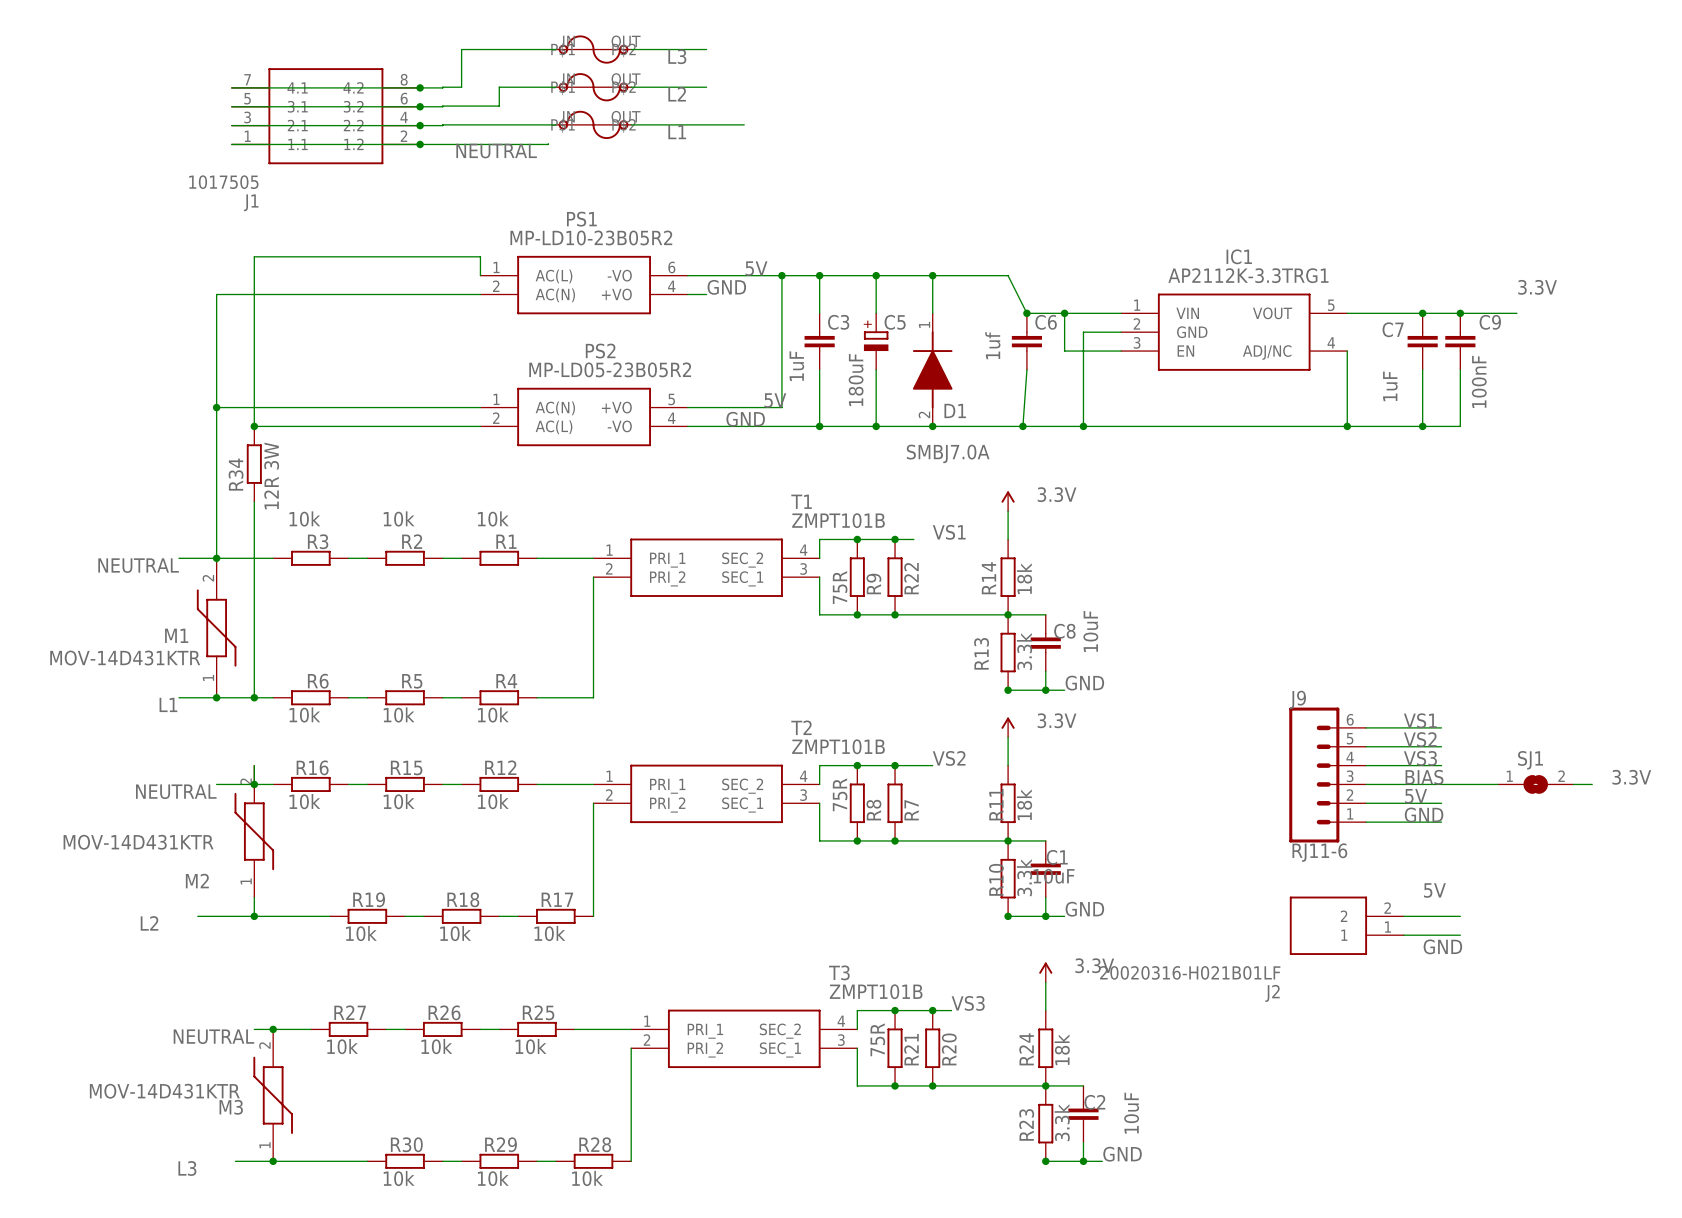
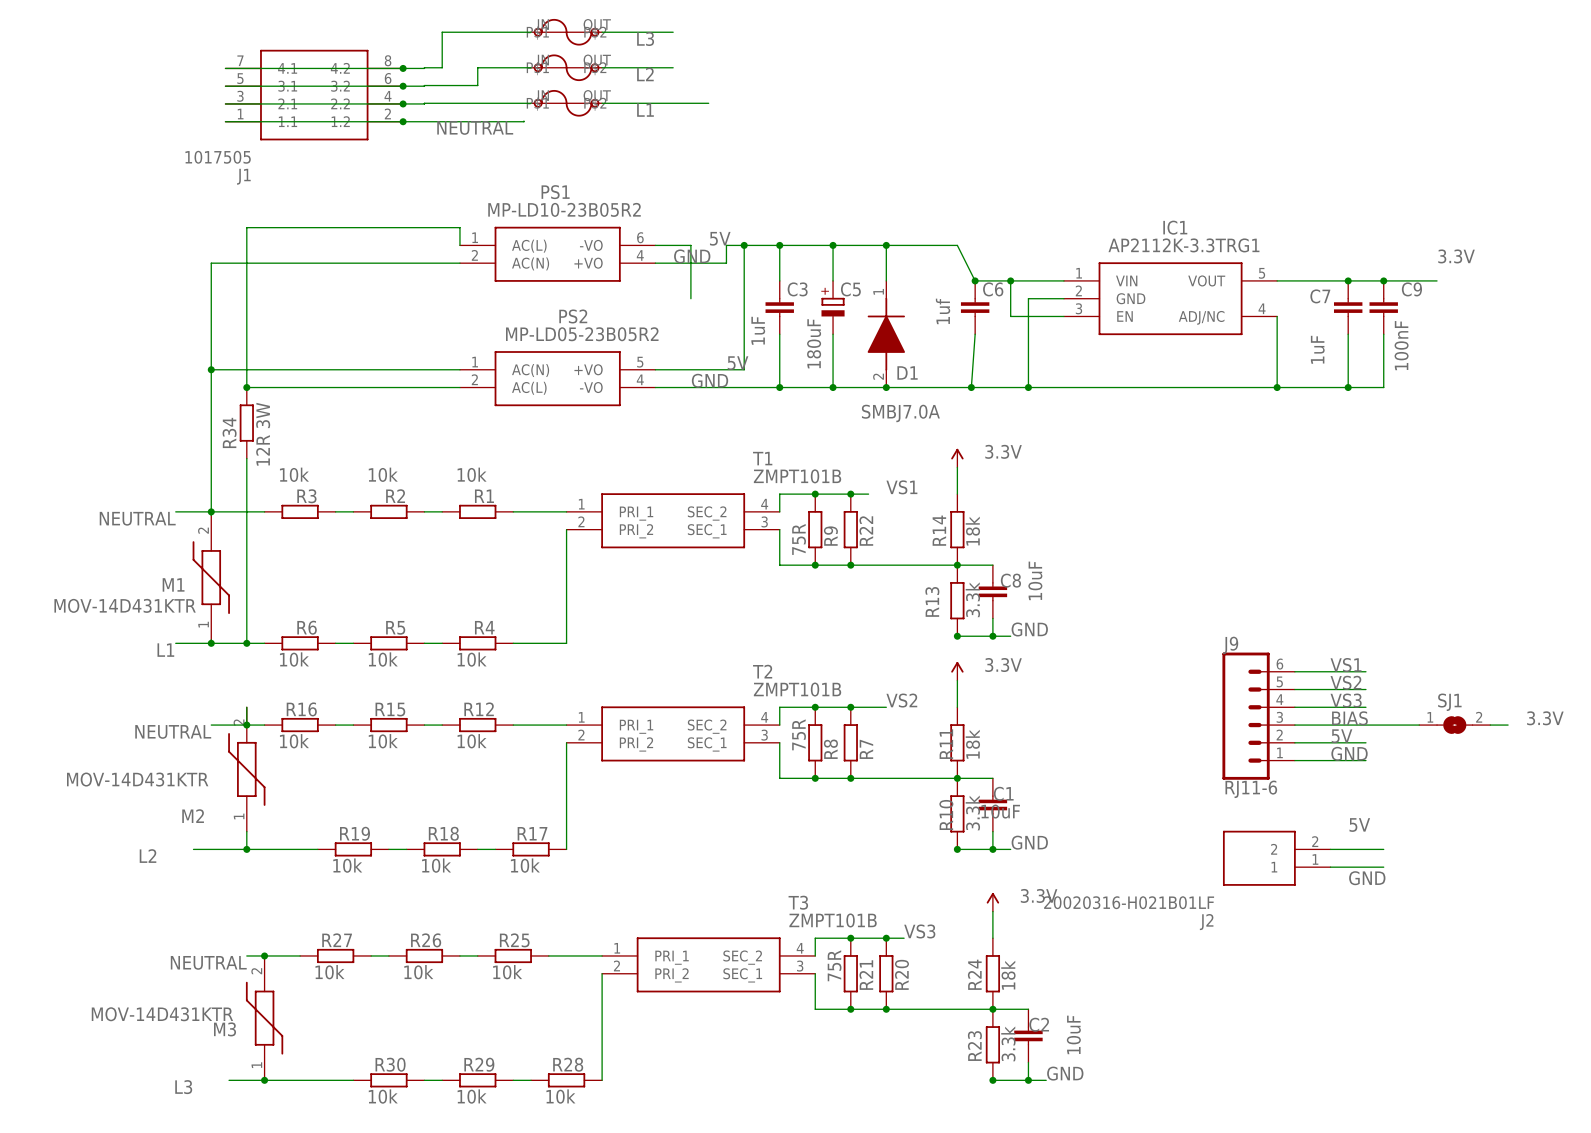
wire: (725, 275) (763, 275) -> (673, 263) (726, 263) (726, 245)
wire: none -> (690, 245) (690, 298)

